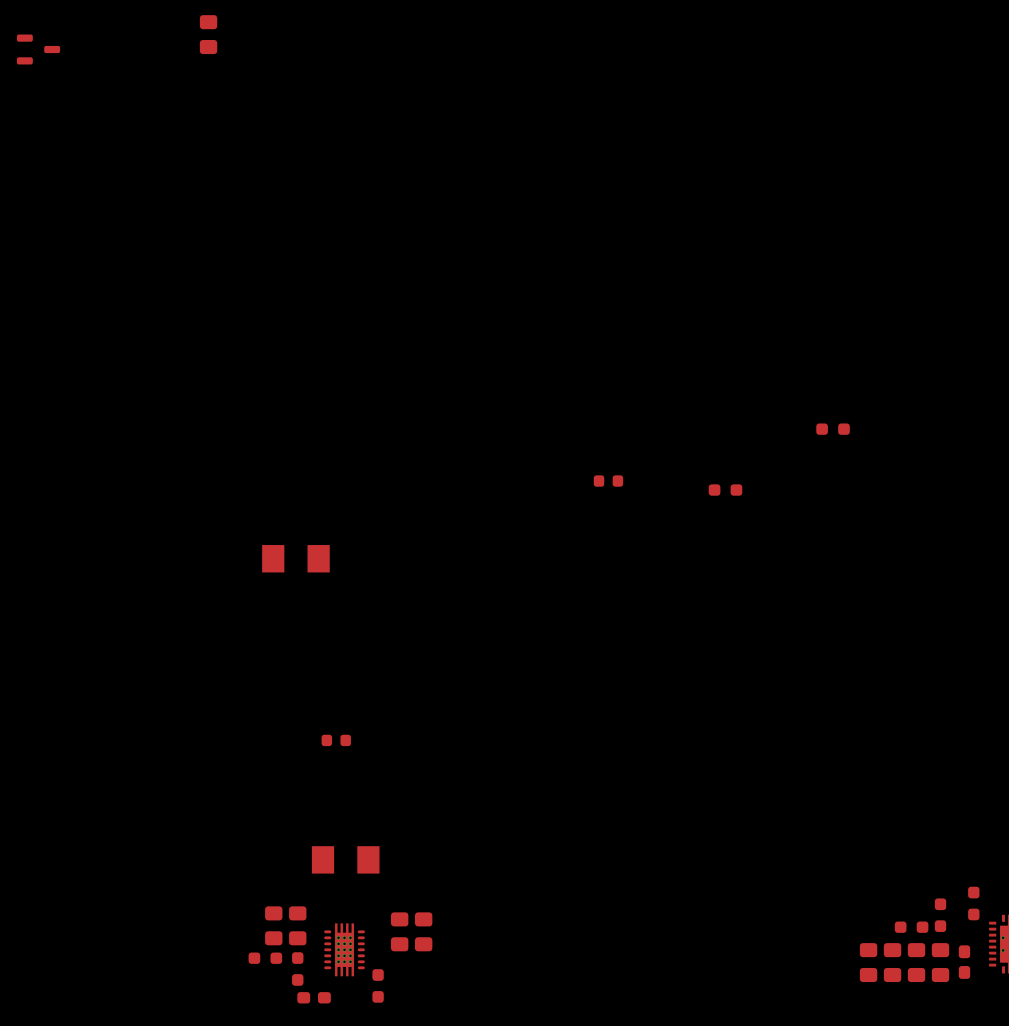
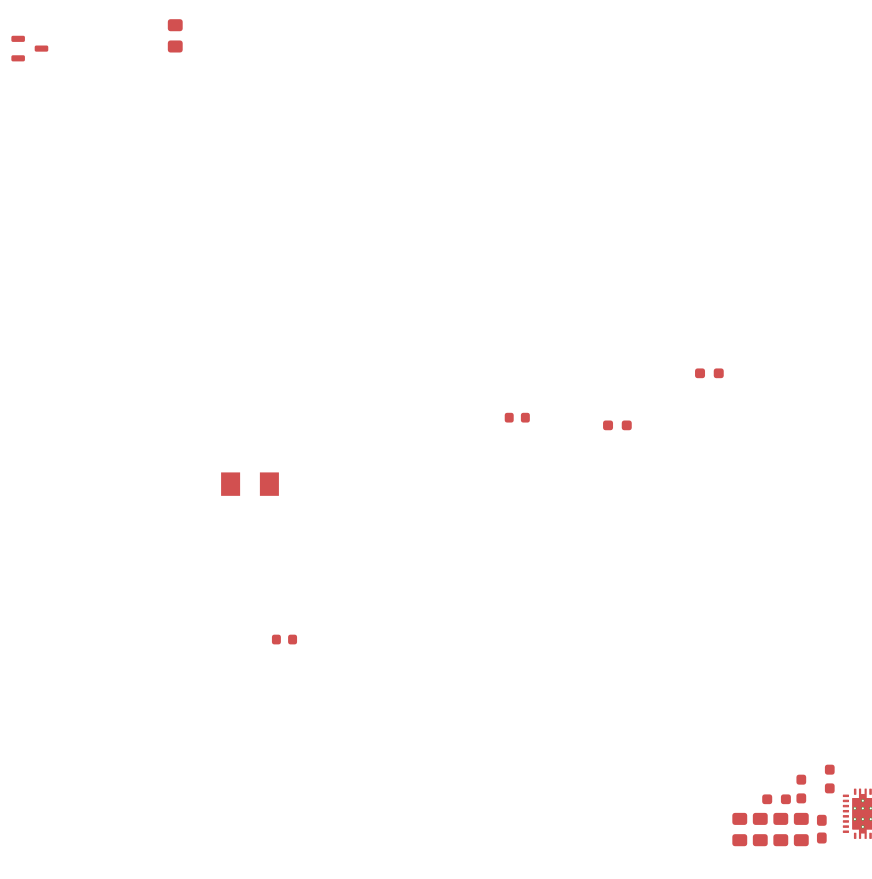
part: (345, 859) -> none
part: (273, 925) -> none
part: (297, 925) -> none
part: (399, 931) -> none
part: (423, 931) -> none
part: (344, 949) -> none
part: (265, 958) -> none
part: (297, 969) -> none
part: (378, 985) -> none
part: (314, 997) -> none

